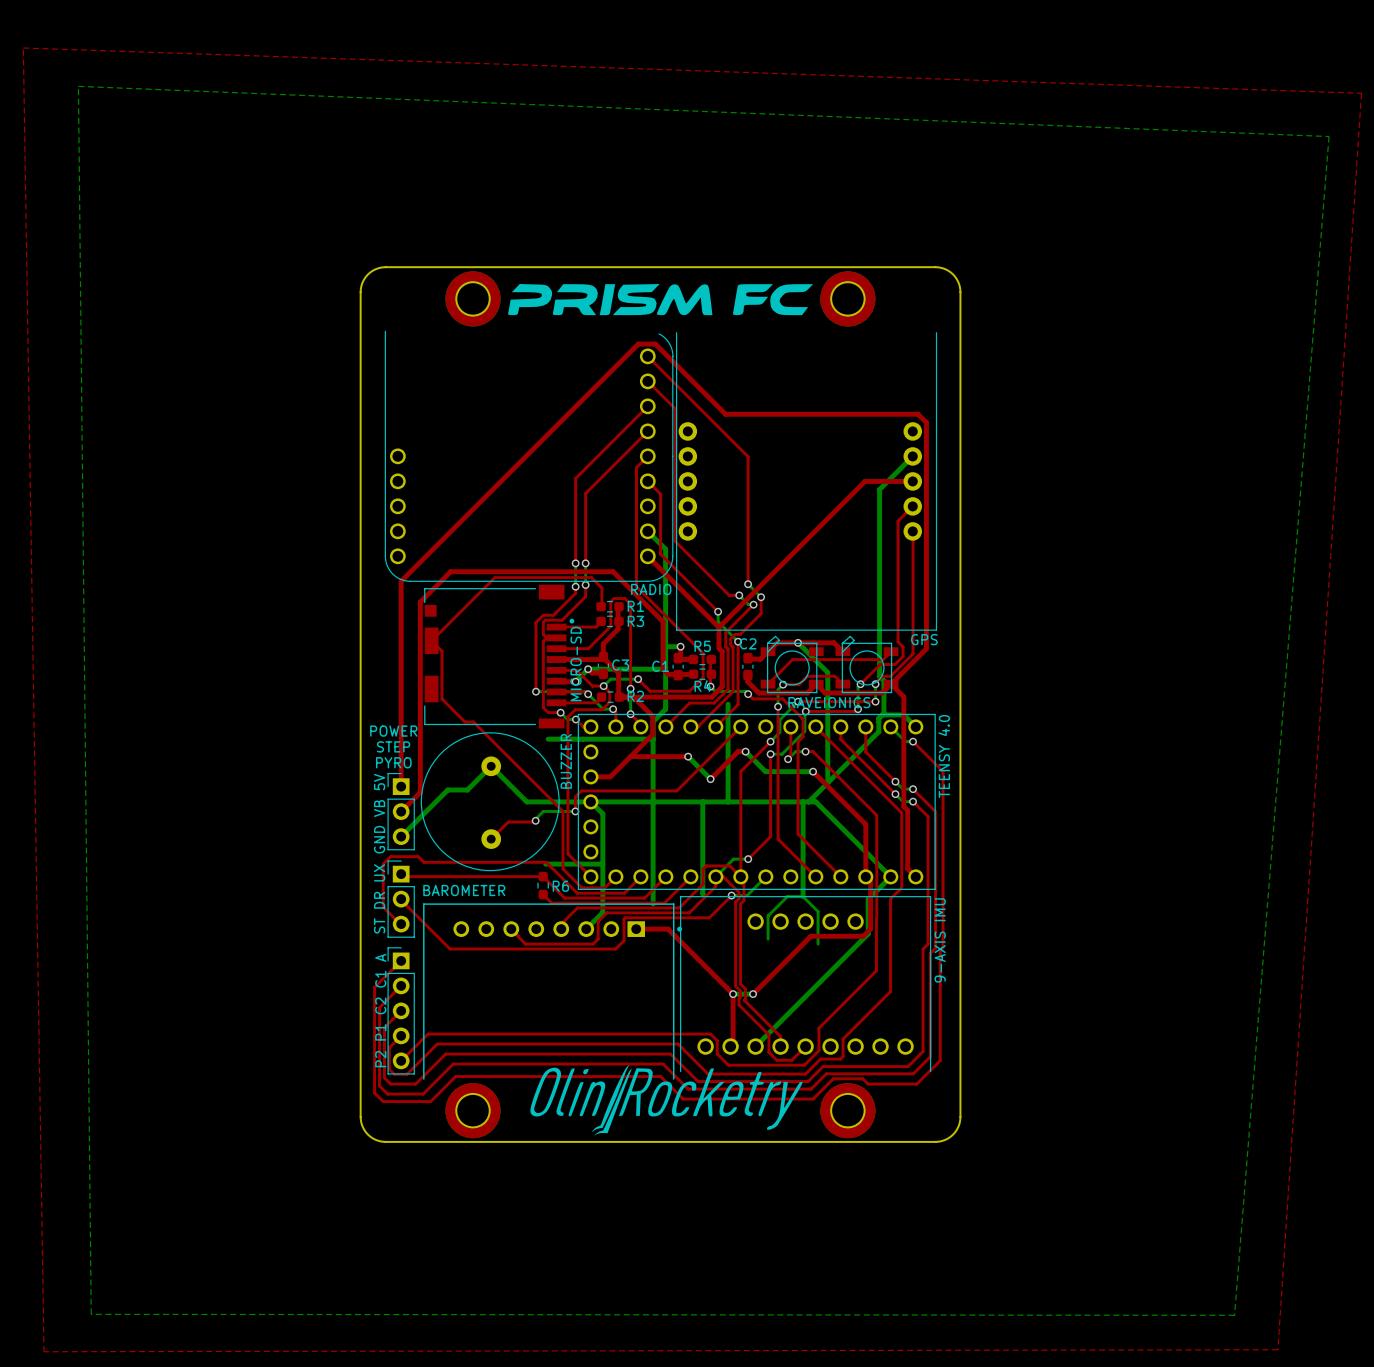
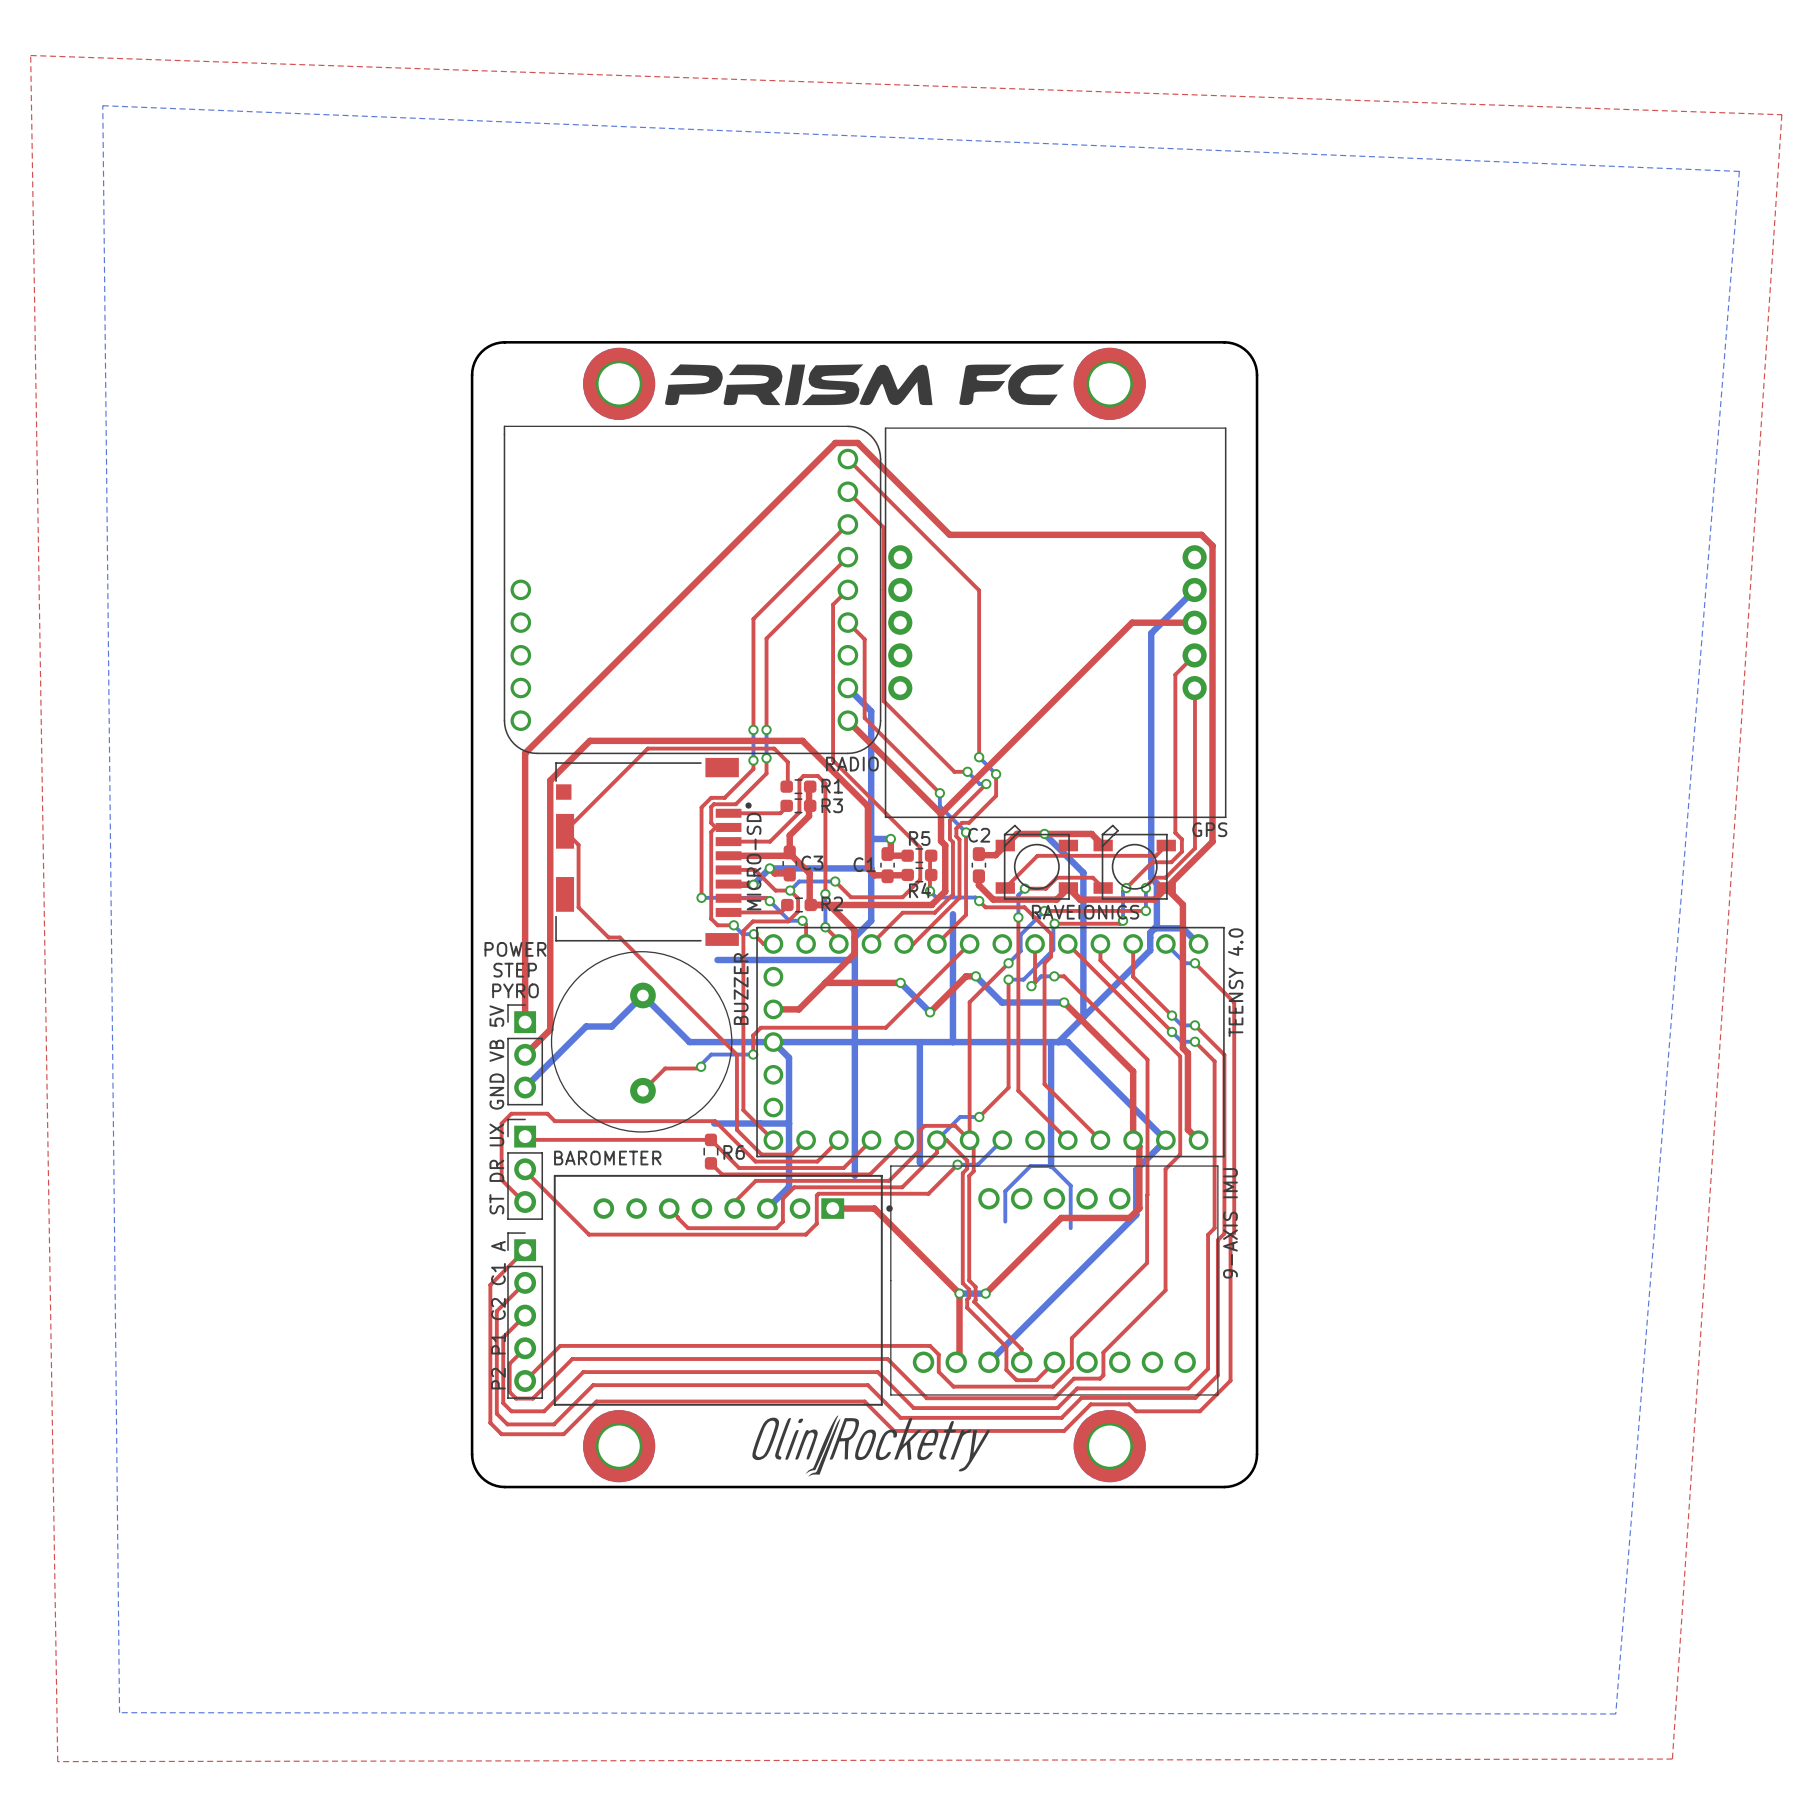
part footprint: [384, 330, 674, 582] -> [503, 425, 882, 755]
part footprint: [676, 332, 938, 631] -> [884, 427, 1227, 819]
part footprint: [680, 896, 932, 1073] -> [890, 1165, 1219, 1396]
part footprint: [423, 903, 683, 1080] -> [553, 1174, 893, 1406]
drawing: [530, 1065, 803, 1136] -> none
drawing: none -> [752, 1415, 990, 1477]

